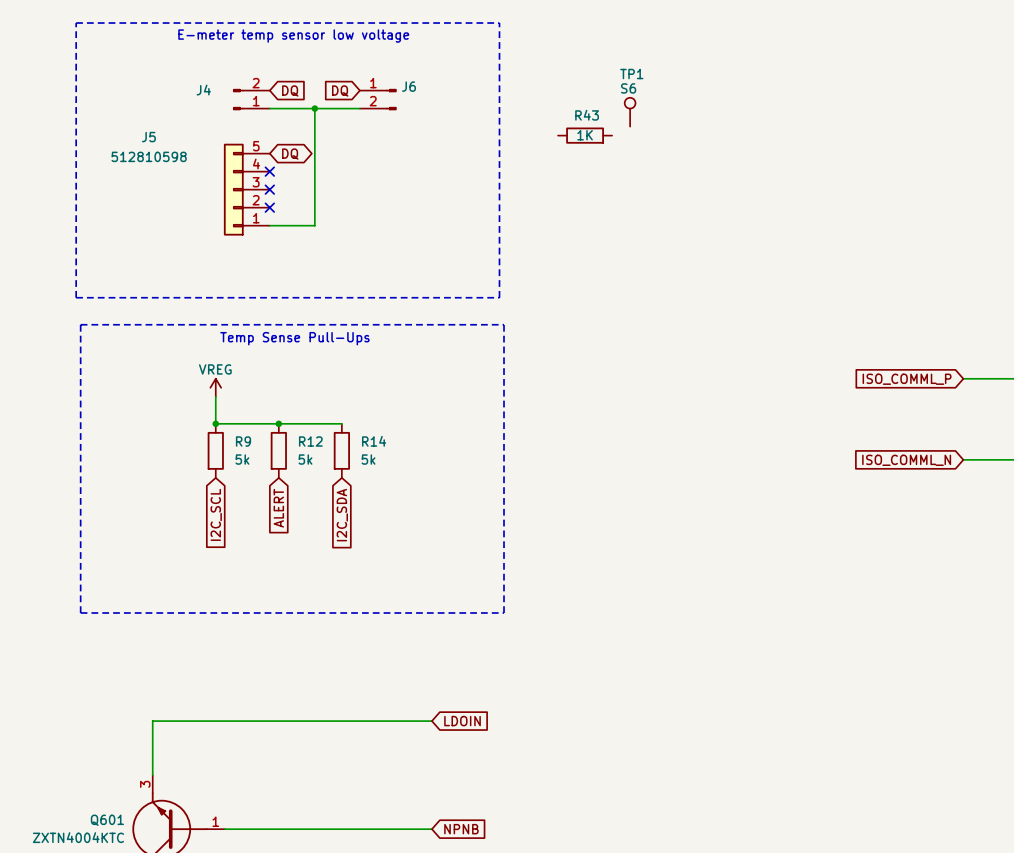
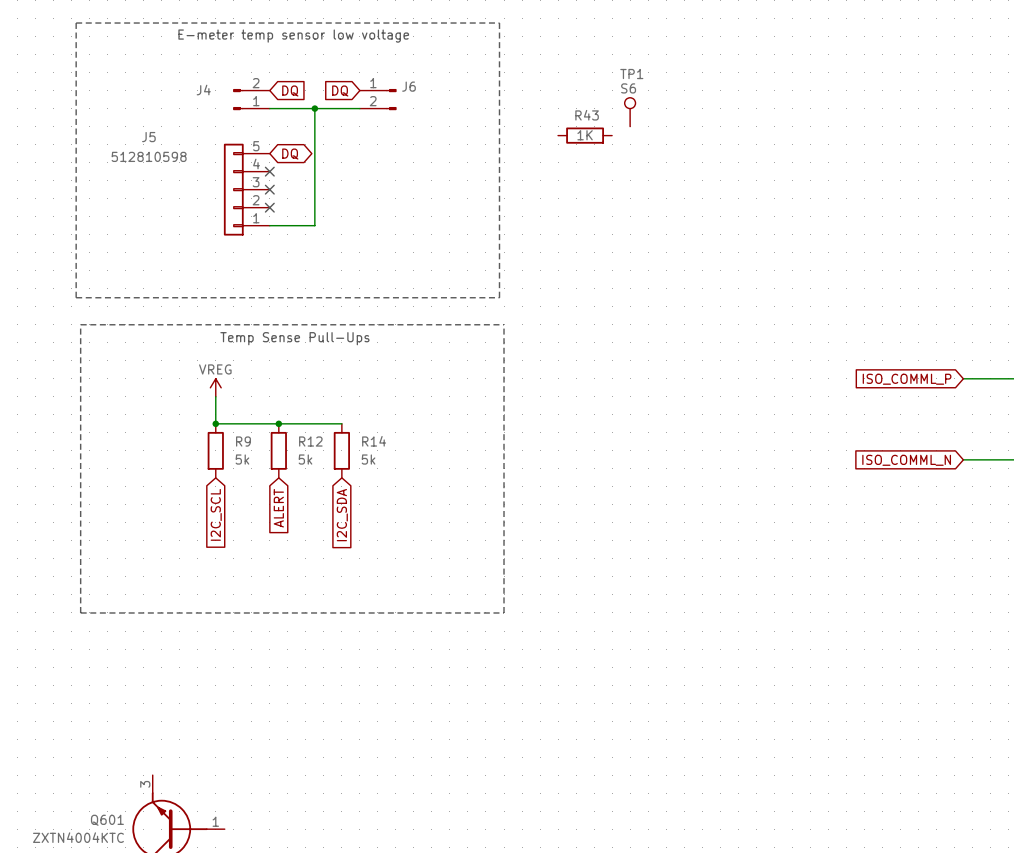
wire: (431, 721) (152, 721) (152, 775) -> none
global label: LDOIN (462, 721) -> none
wire: (224, 829) (431, 829) -> none
global label: NPNB (461, 829) -> none

